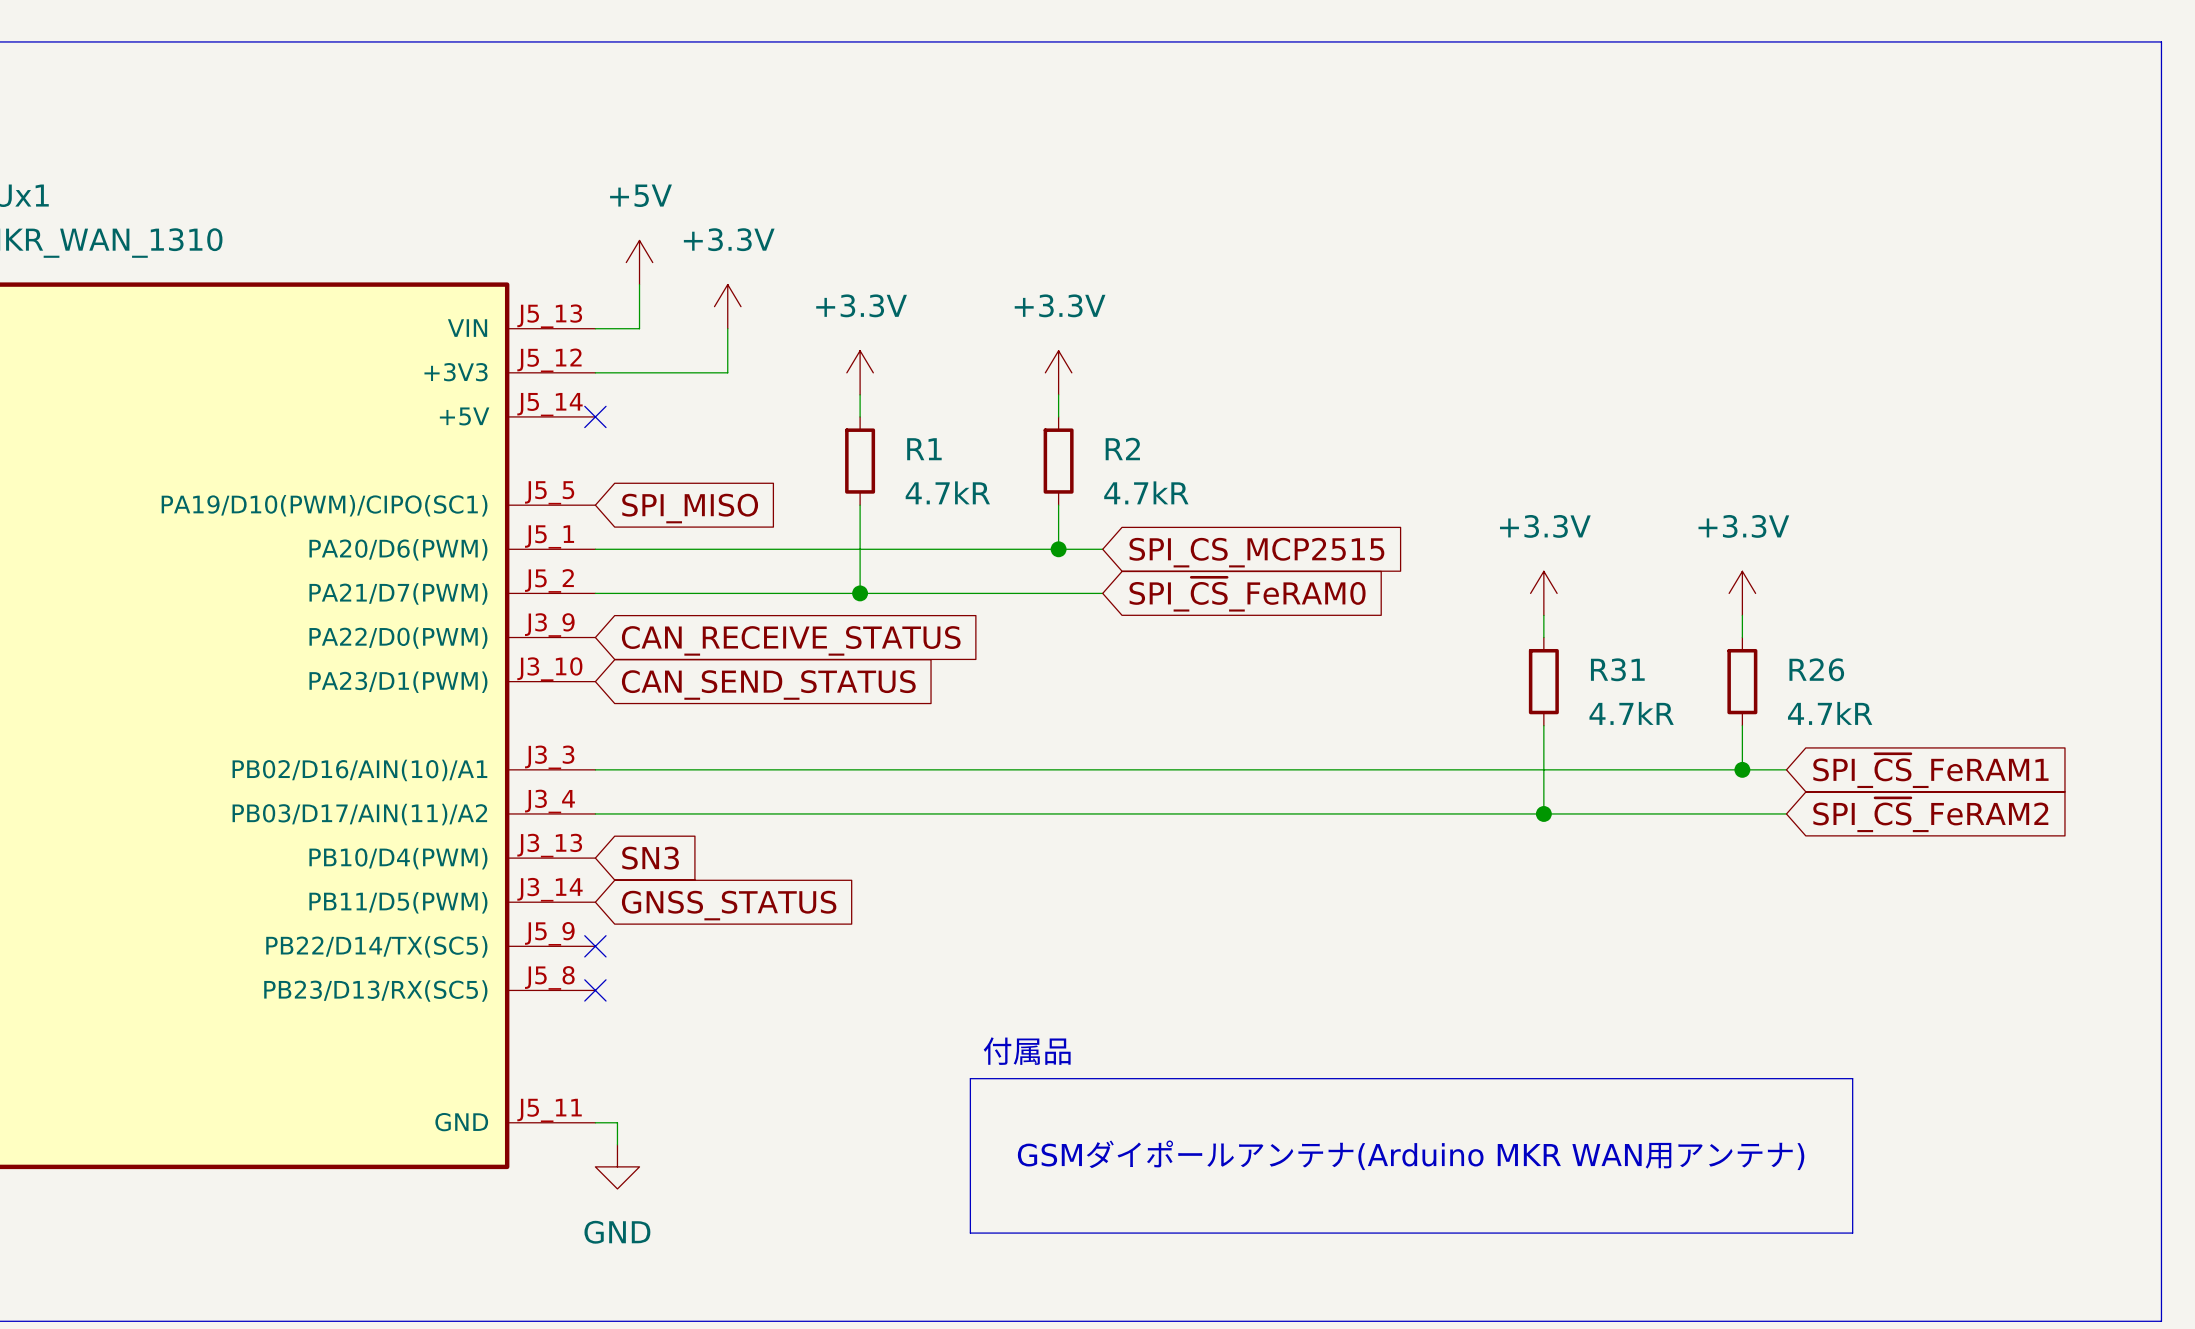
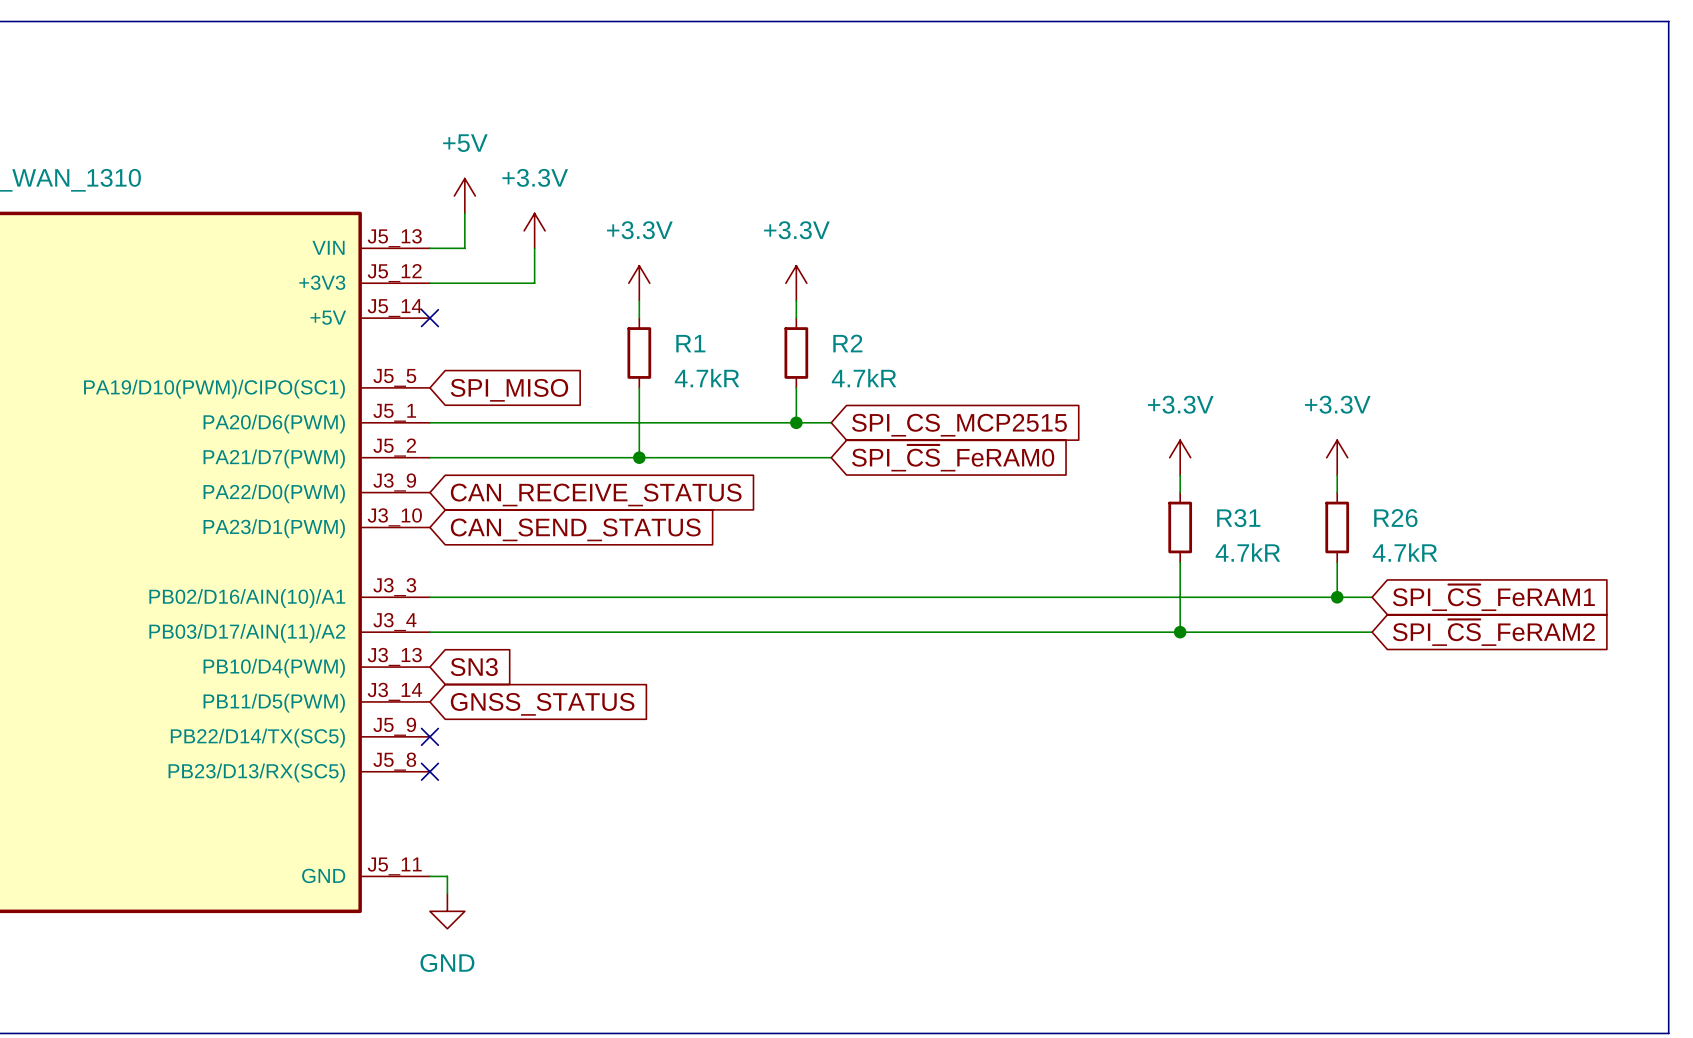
text: 付属品 (1027, 1051) -> none
line: (970, 1078) (1852, 1078) (1852, 1233) (970, 1233) (970, 1078) -> none
text: GSMダイポールアンテナ(Arduino MKR WAN用アンテナ) (1411, 1155) -> none

